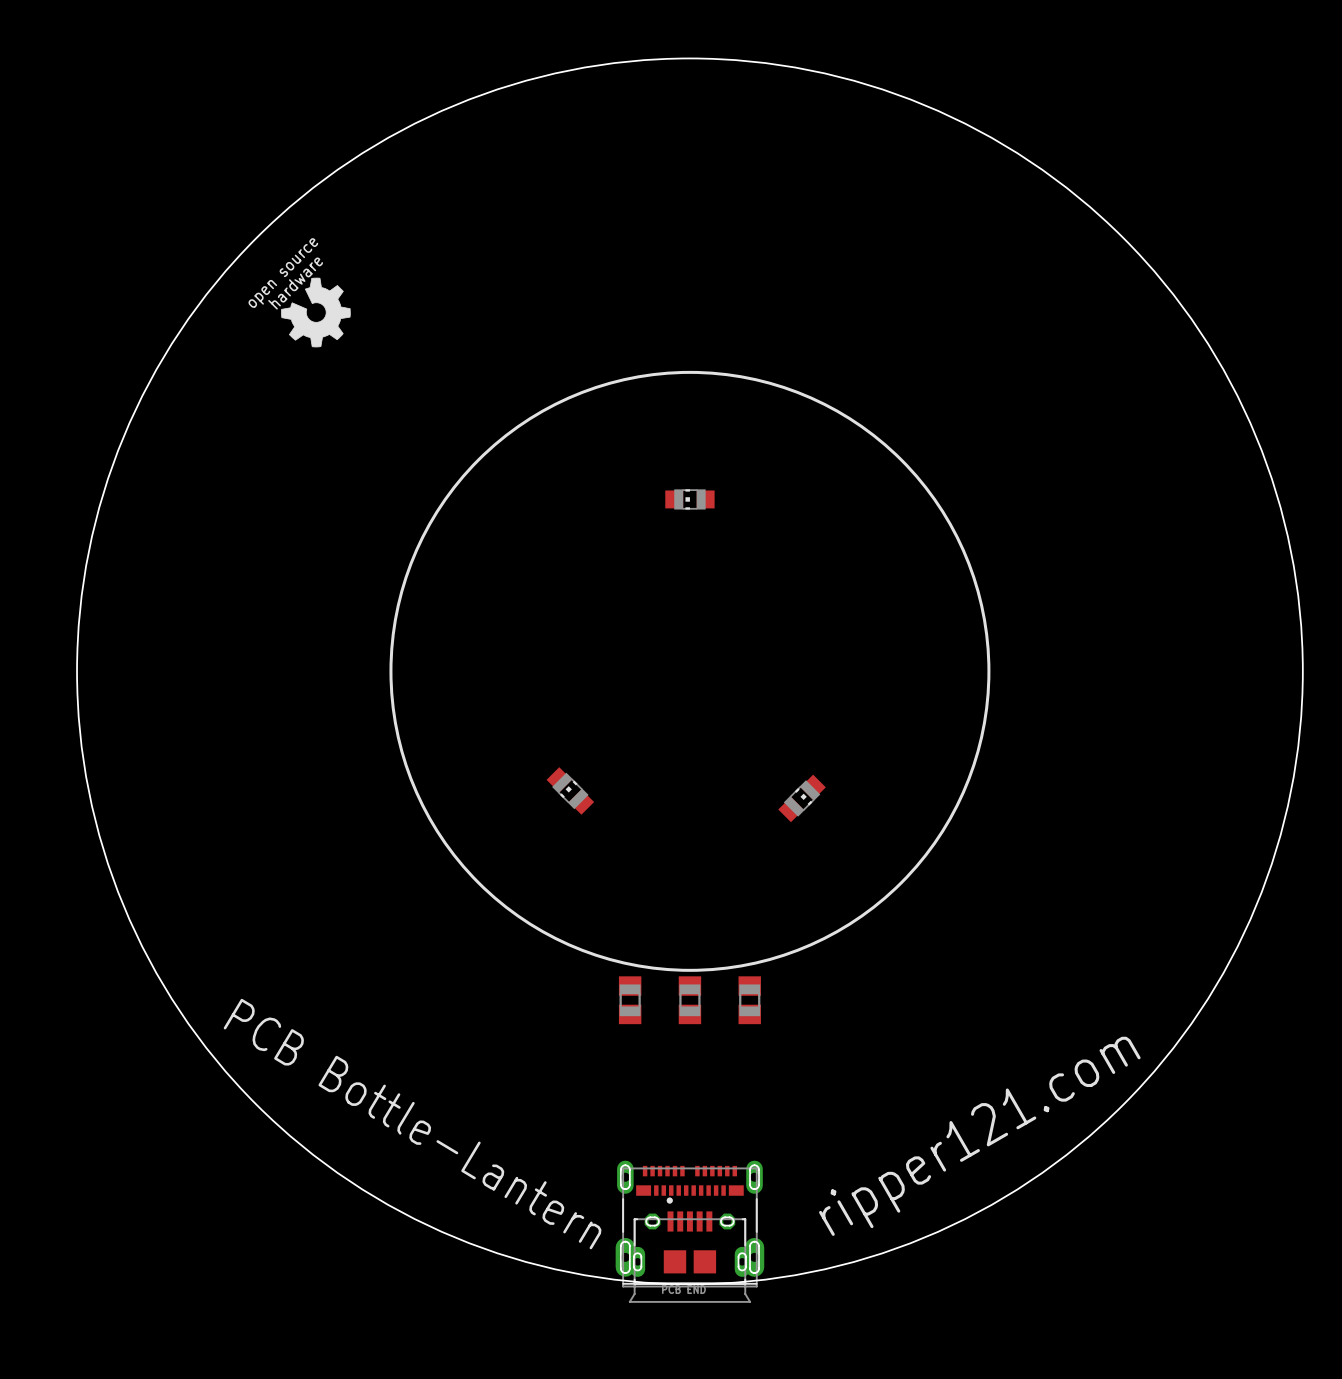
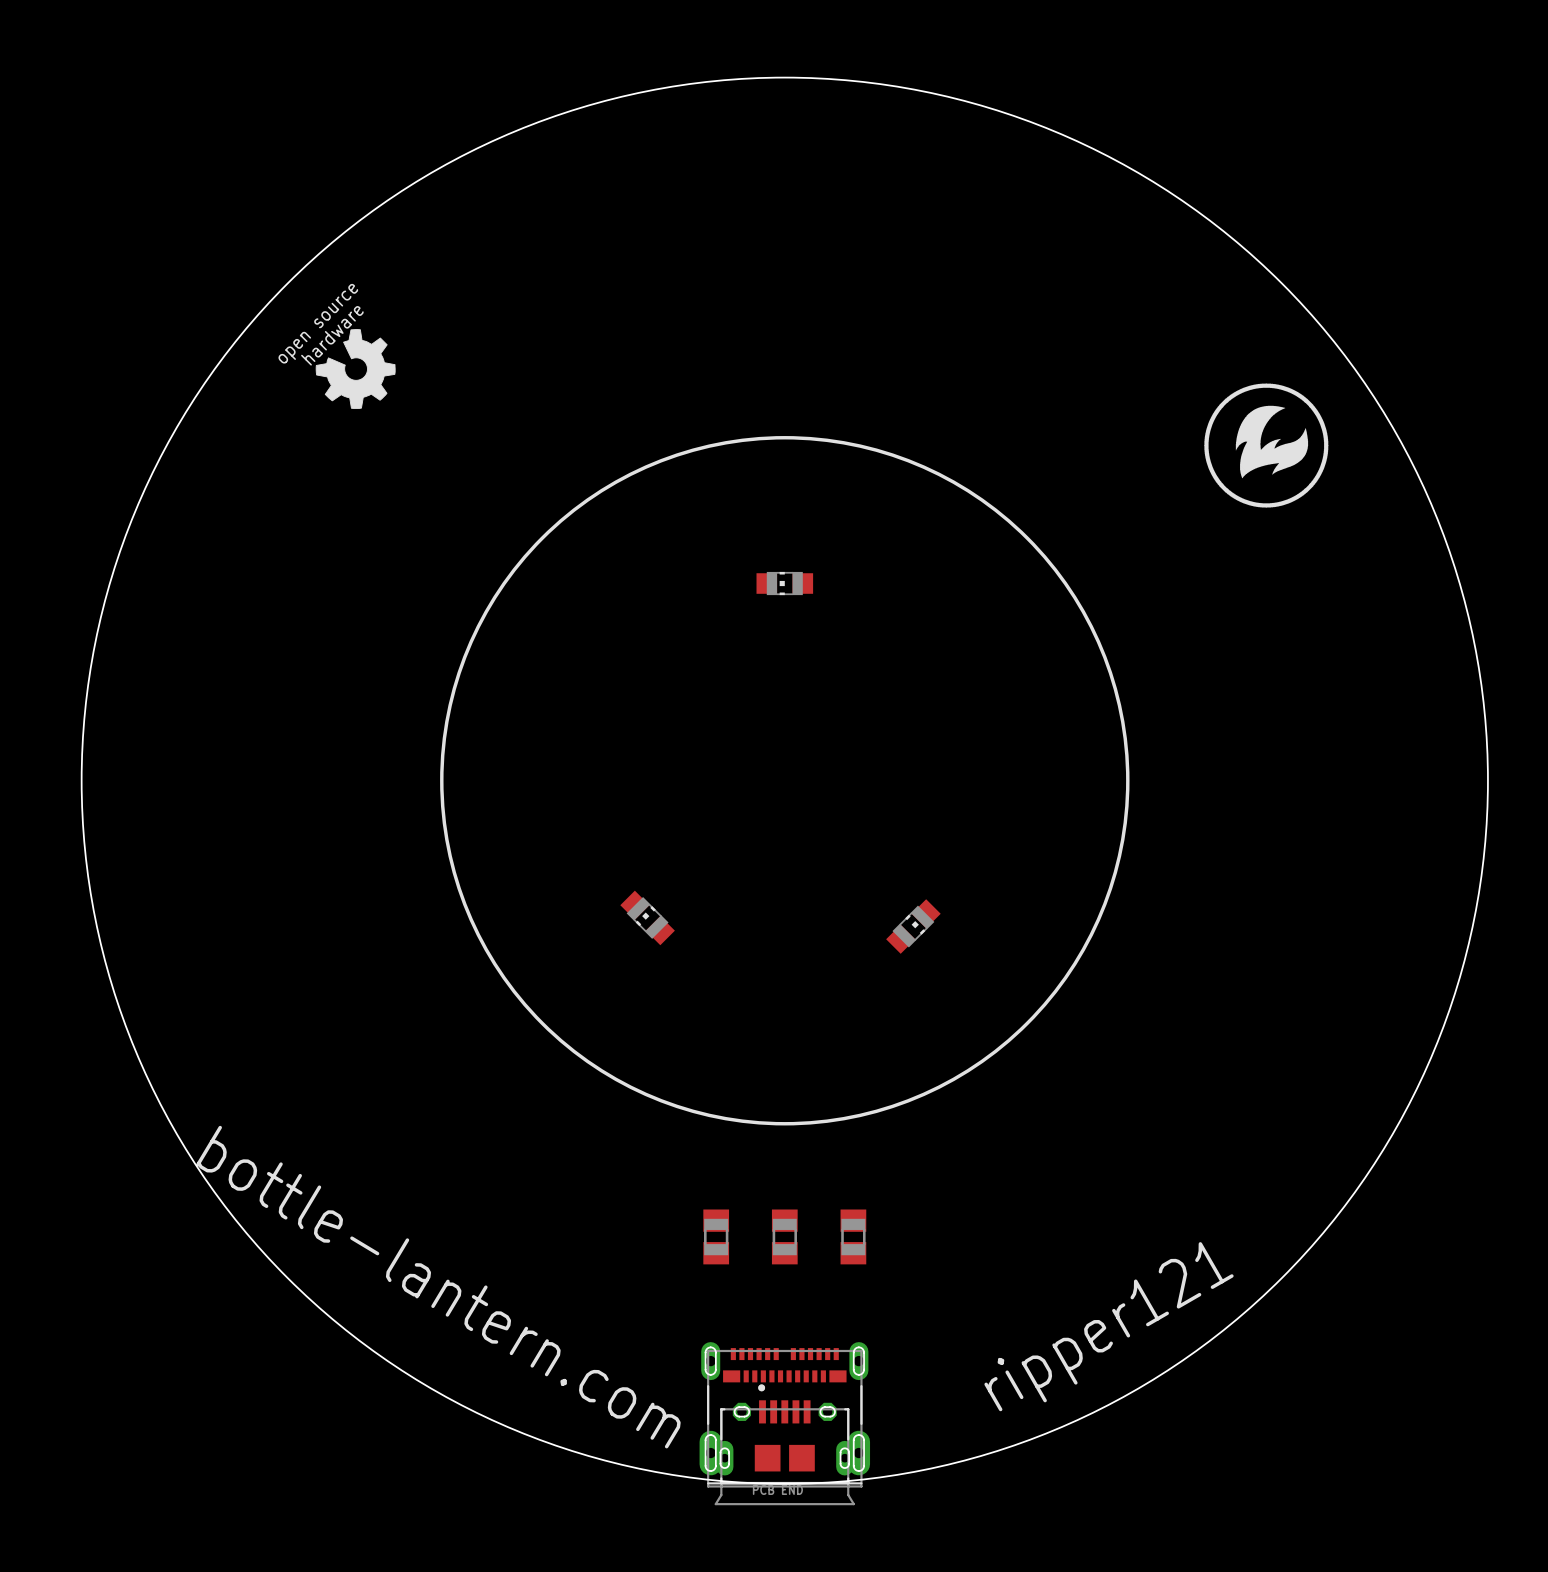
drawing: none -> [1204, 383, 1329, 508]
part: (630, 1000) -> none
part: (689, 1000) -> none
part: (749, 1000) -> none
part: none -> (716, 1236)
part: none -> (784, 1236)
part: none -> (853, 1236)
text: PCB Bottle-Lantern (412, 1124) -> bottle-lantern.com (438, 1287)
text: ripper121.com (979, 1136) -> ripper121 (1109, 1326)

